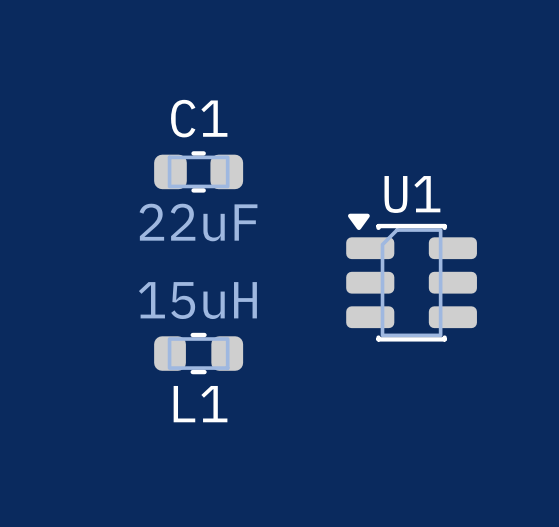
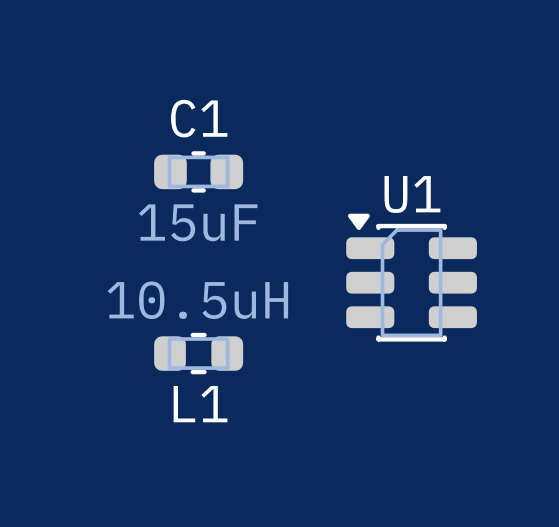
C1 value: 22uF (198, 222) -> 15uF (198, 222)
L1 value: 15uH (197, 300) -> 10.5uH (197, 300)

